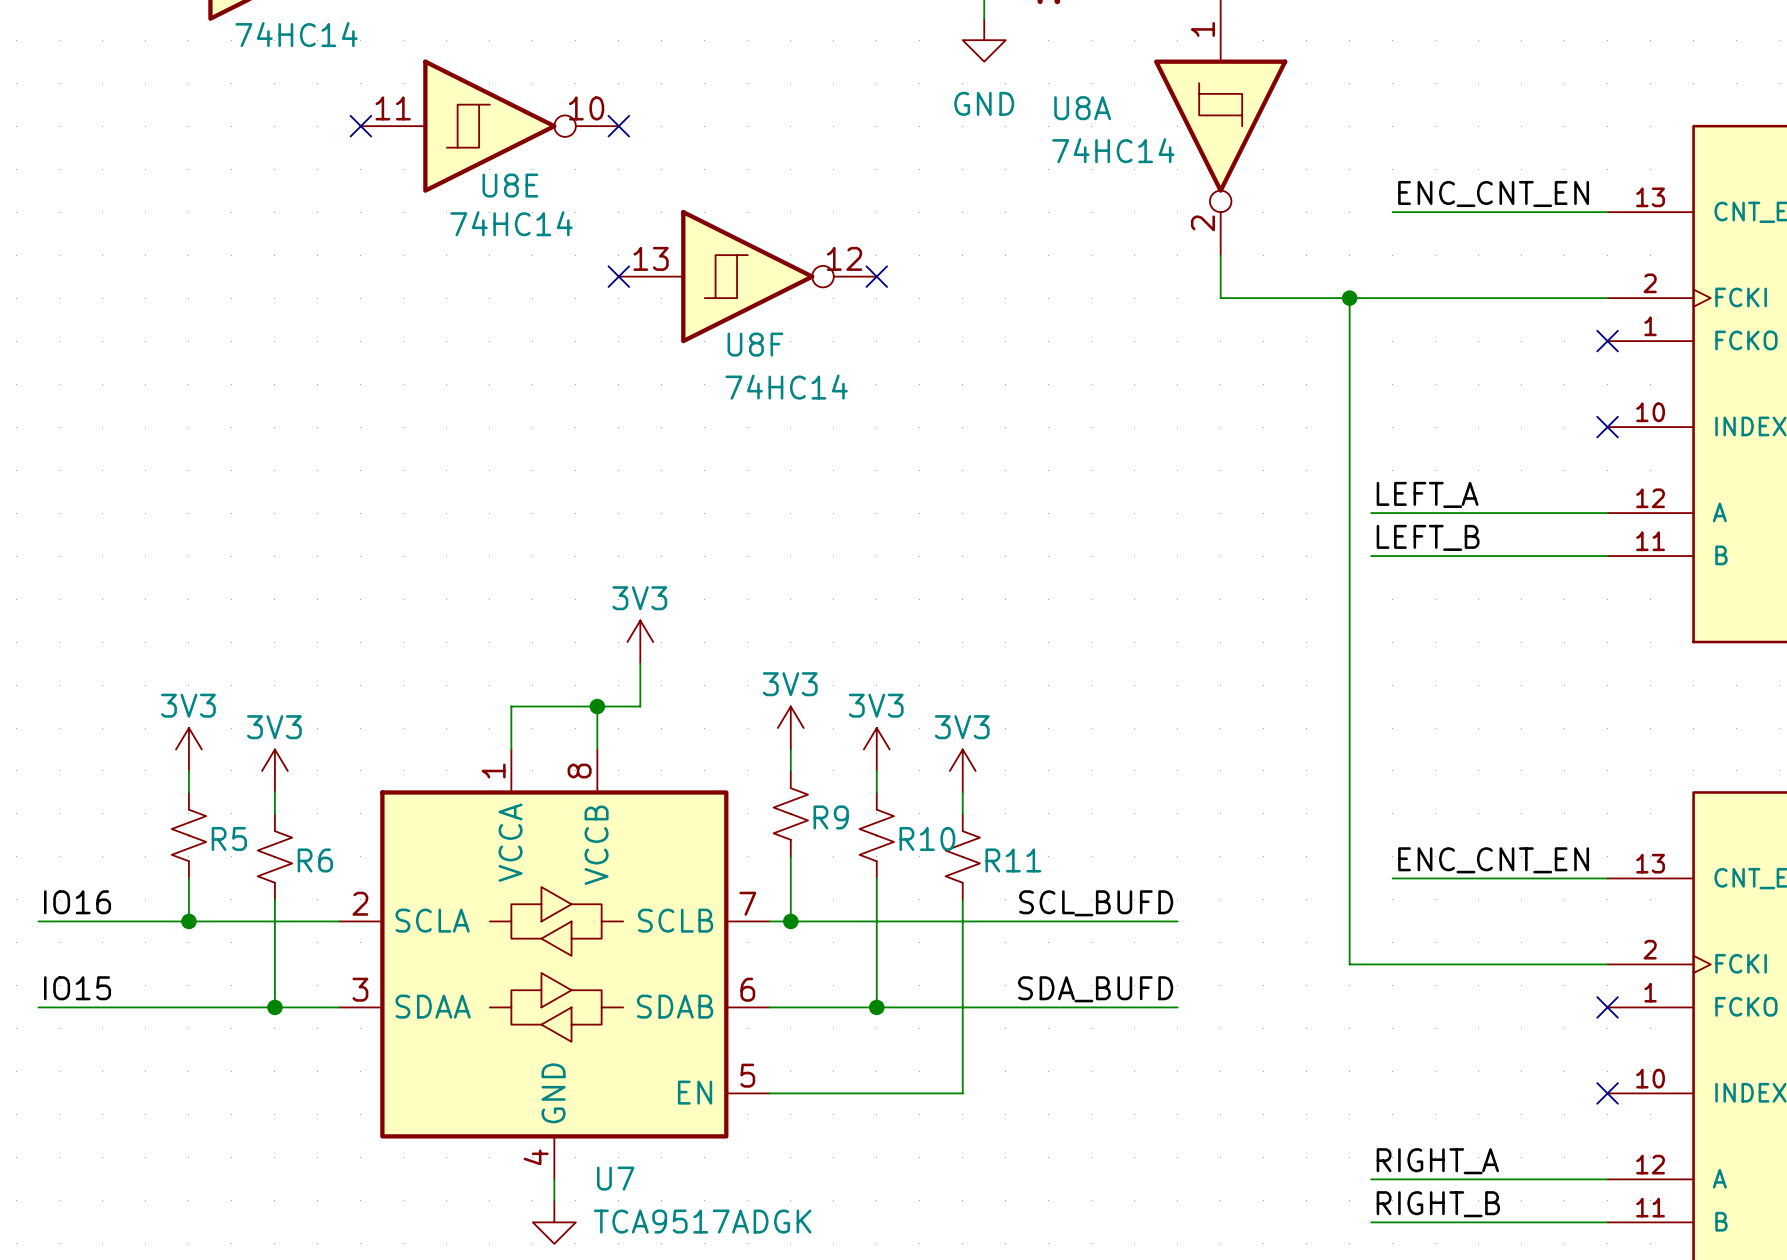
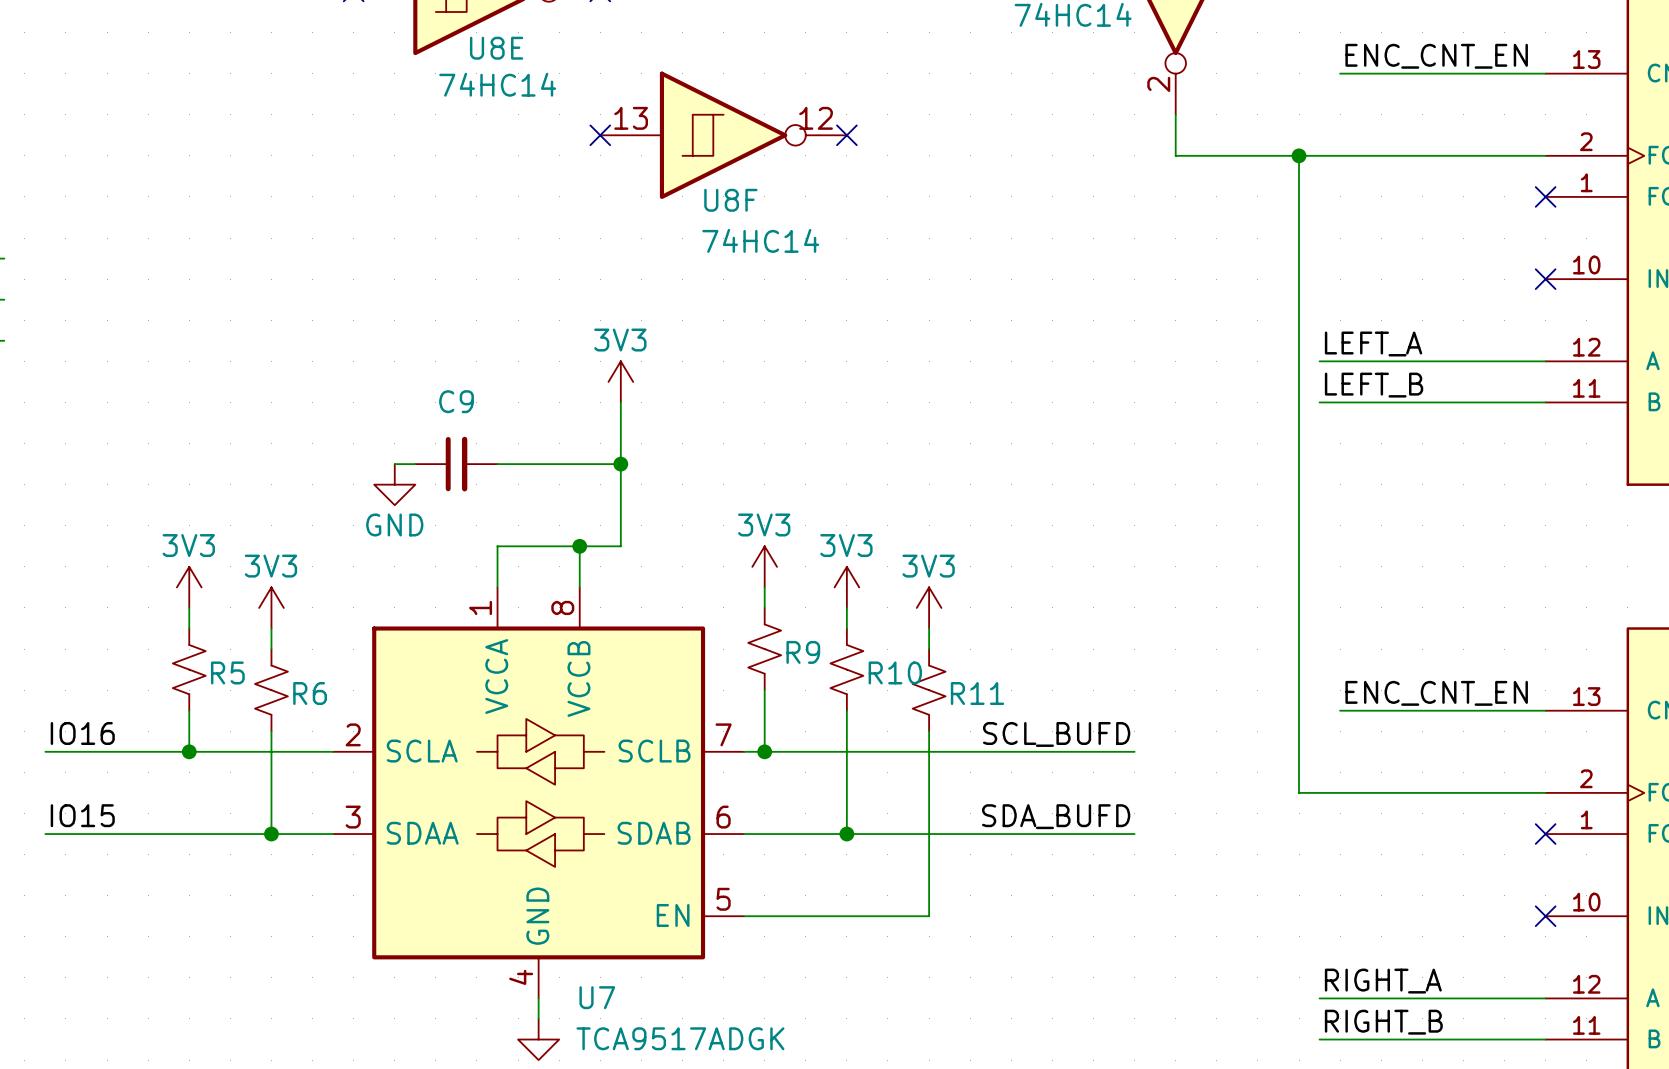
wire: none -> (620, 402) (620, 505)
wire: none -> (394, 464) (415, 464)
C9: none -> (456, 464)
wire: none -> (497, 464) (620, 464)
junction: none -> (620, 464)
power symbol: none -> GND (394, 484)
power symbol position: 3V3 (640, 642) -> 3V3 (620, 381)

